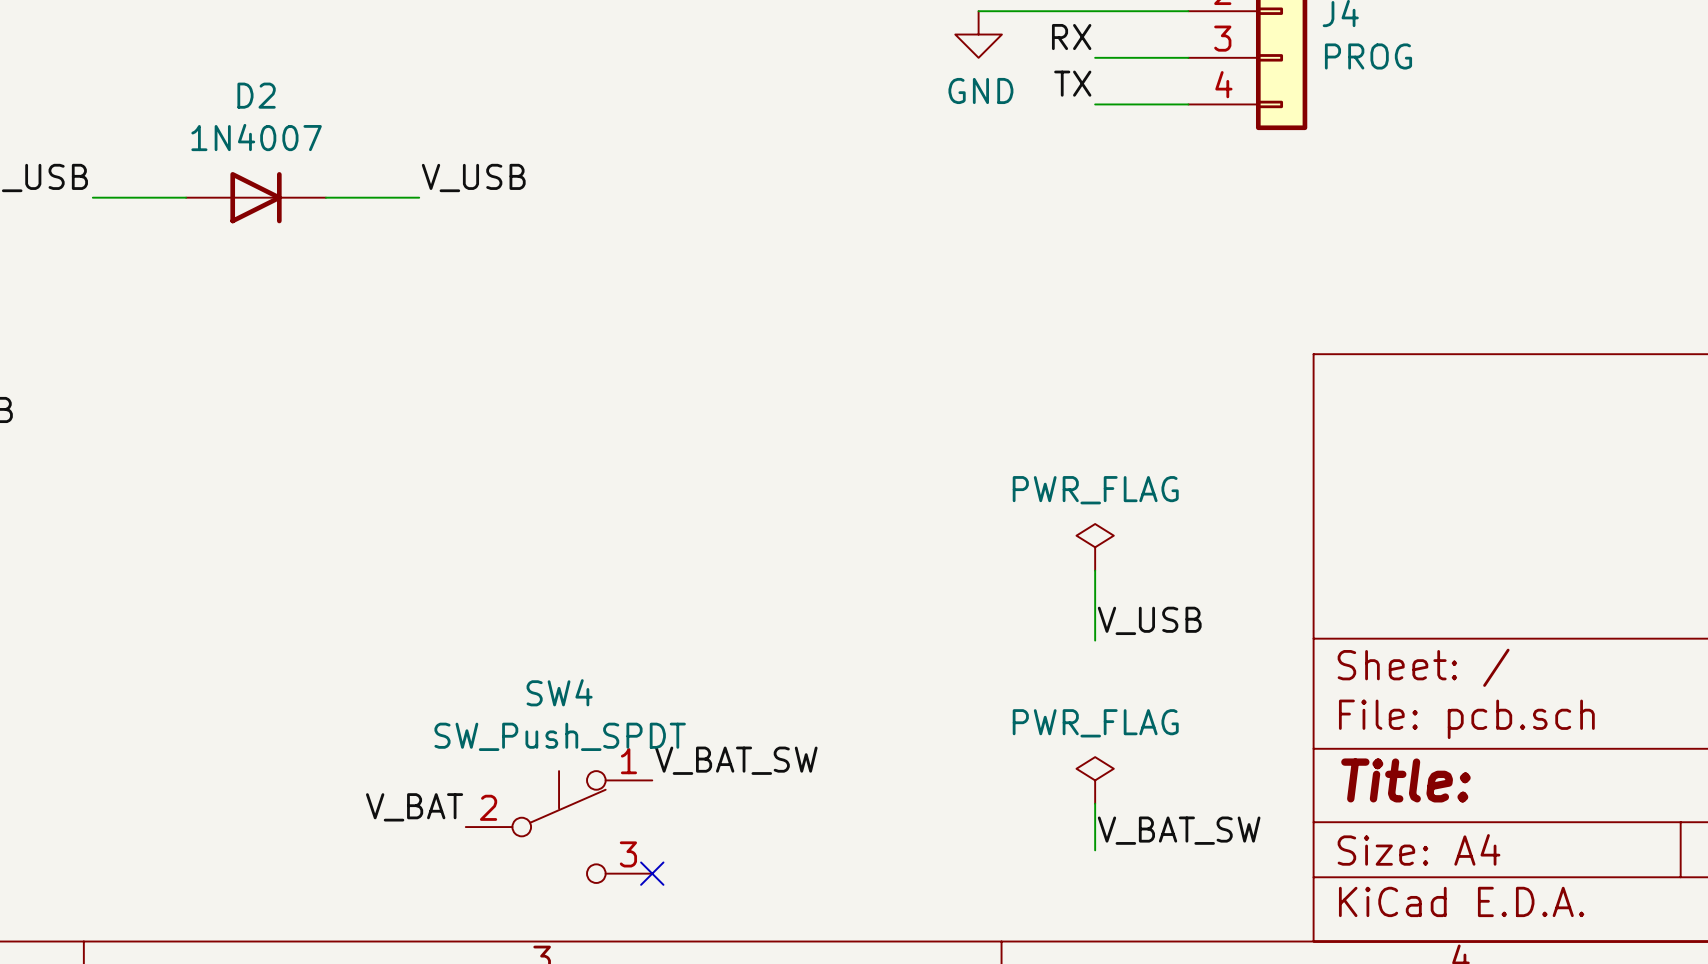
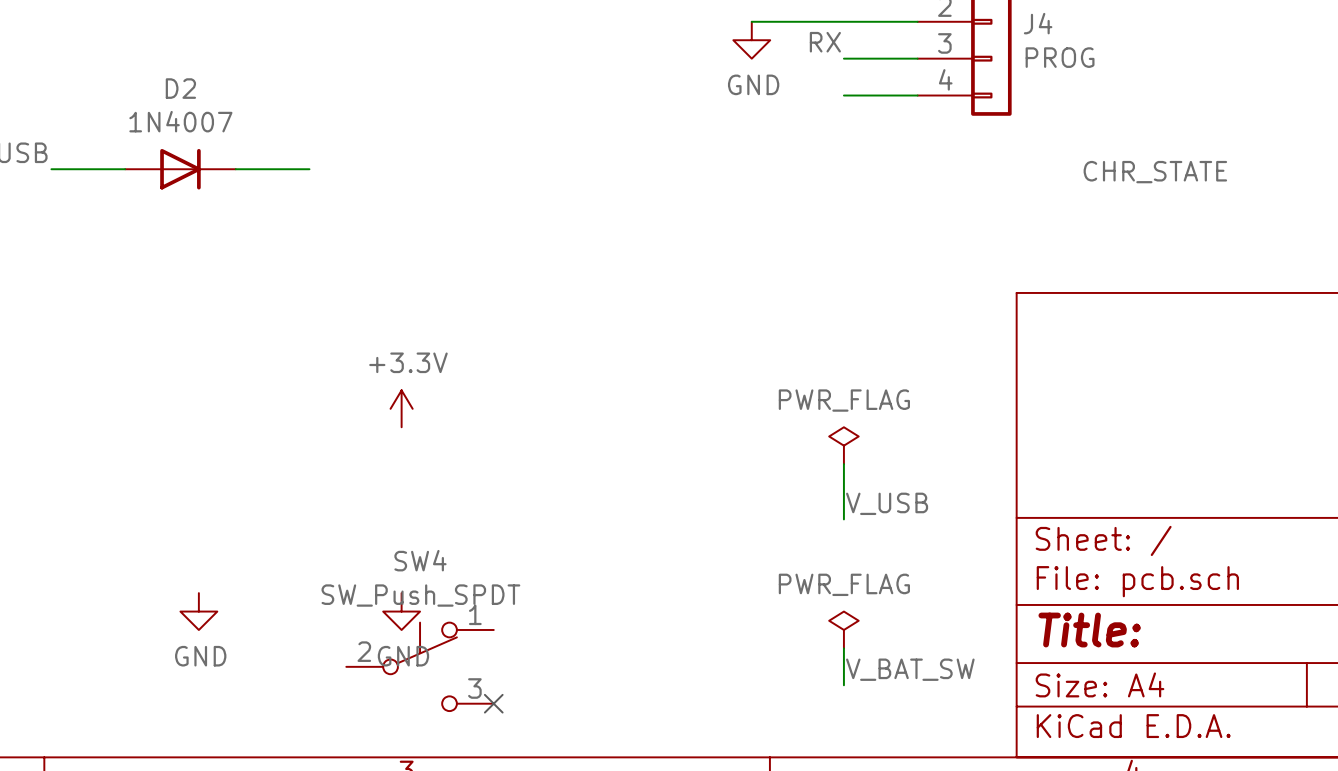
label: TX (1072, 83) -> none
label: V_USB (473, 177) -> none
label: none -> CHR_STATE (1155, 172)
power symbol: none -> +3.3V (401, 408)
power symbol: none -> GND (198, 611)
power symbol: none -> GND (401, 611)
label: V_BAT_SW (736, 760) -> none
label: V_BAT (414, 807) -> none

